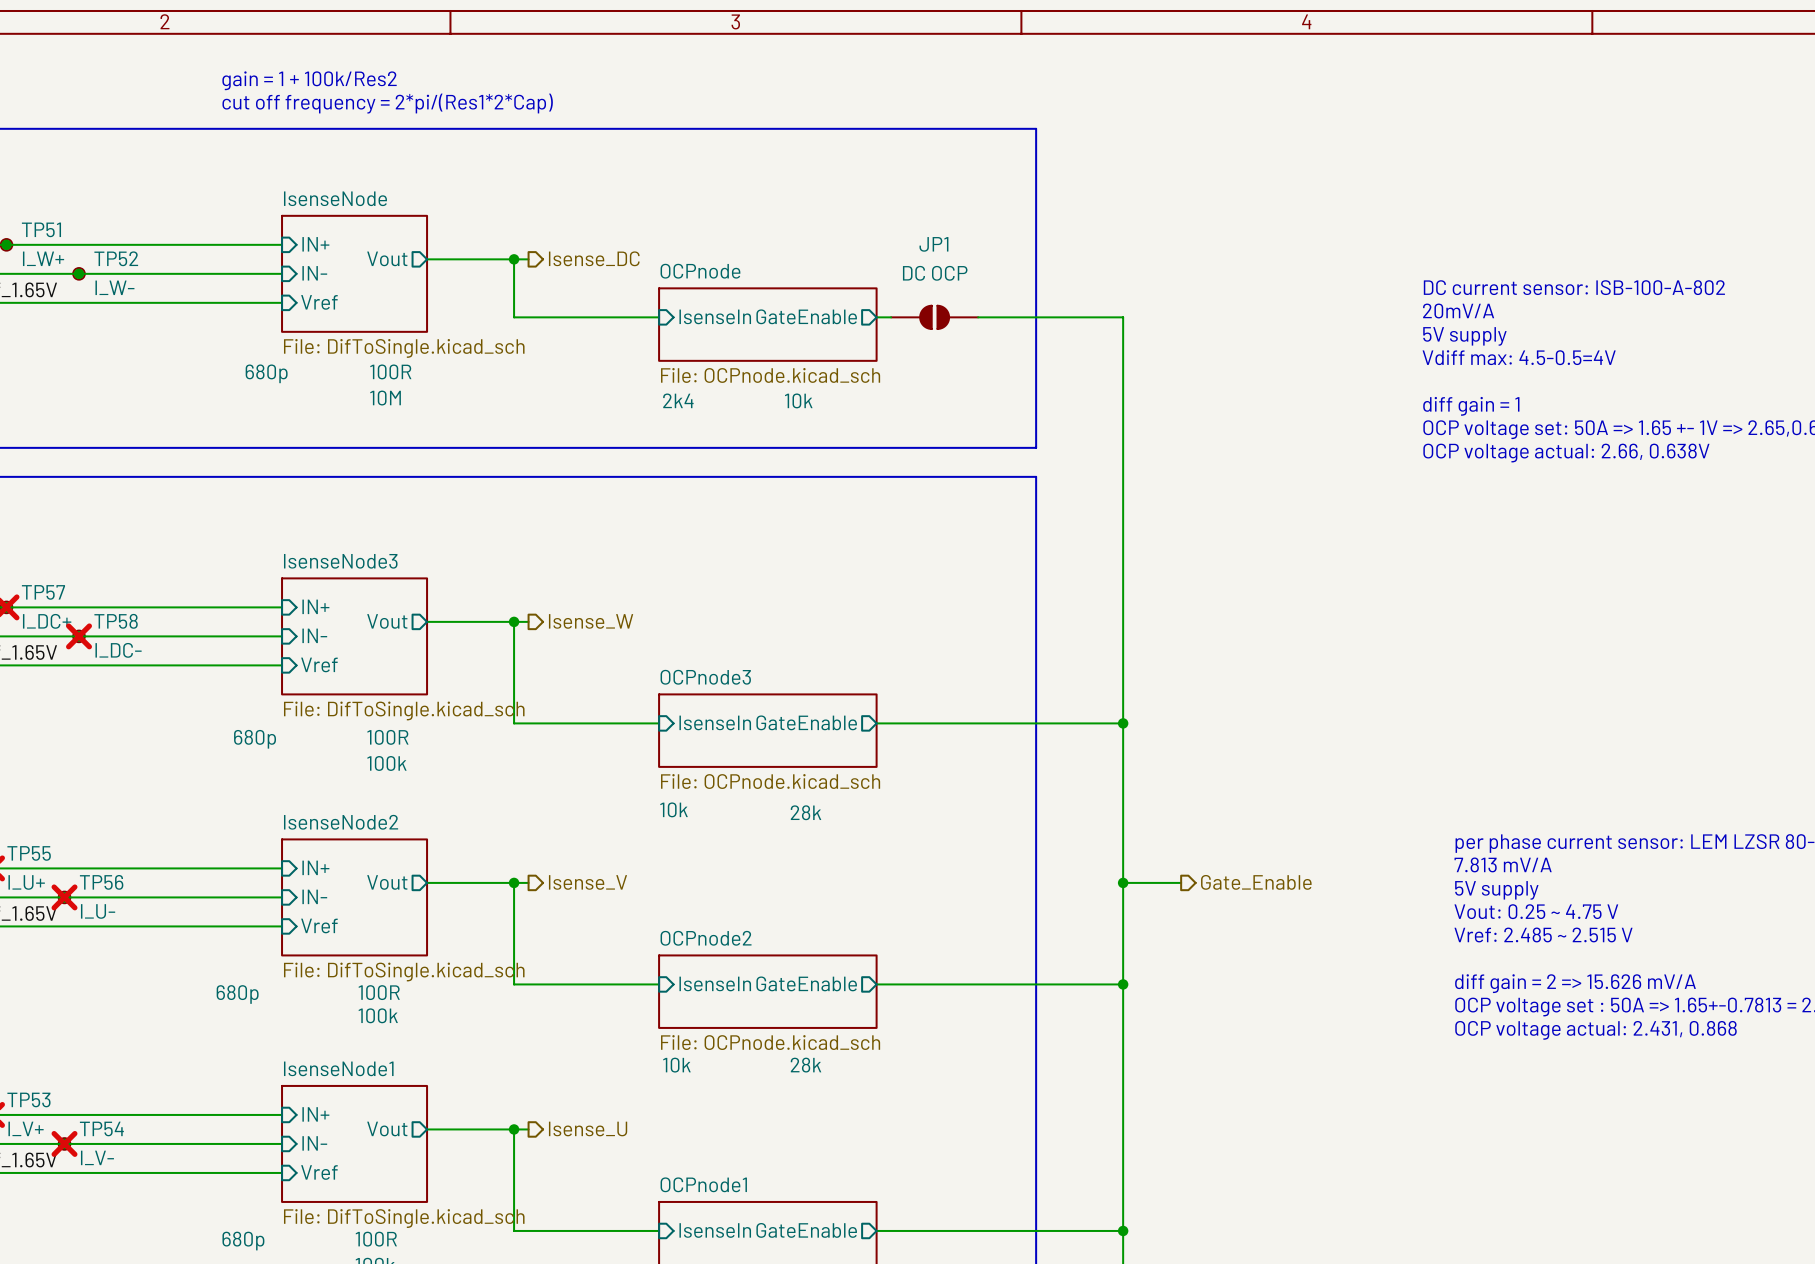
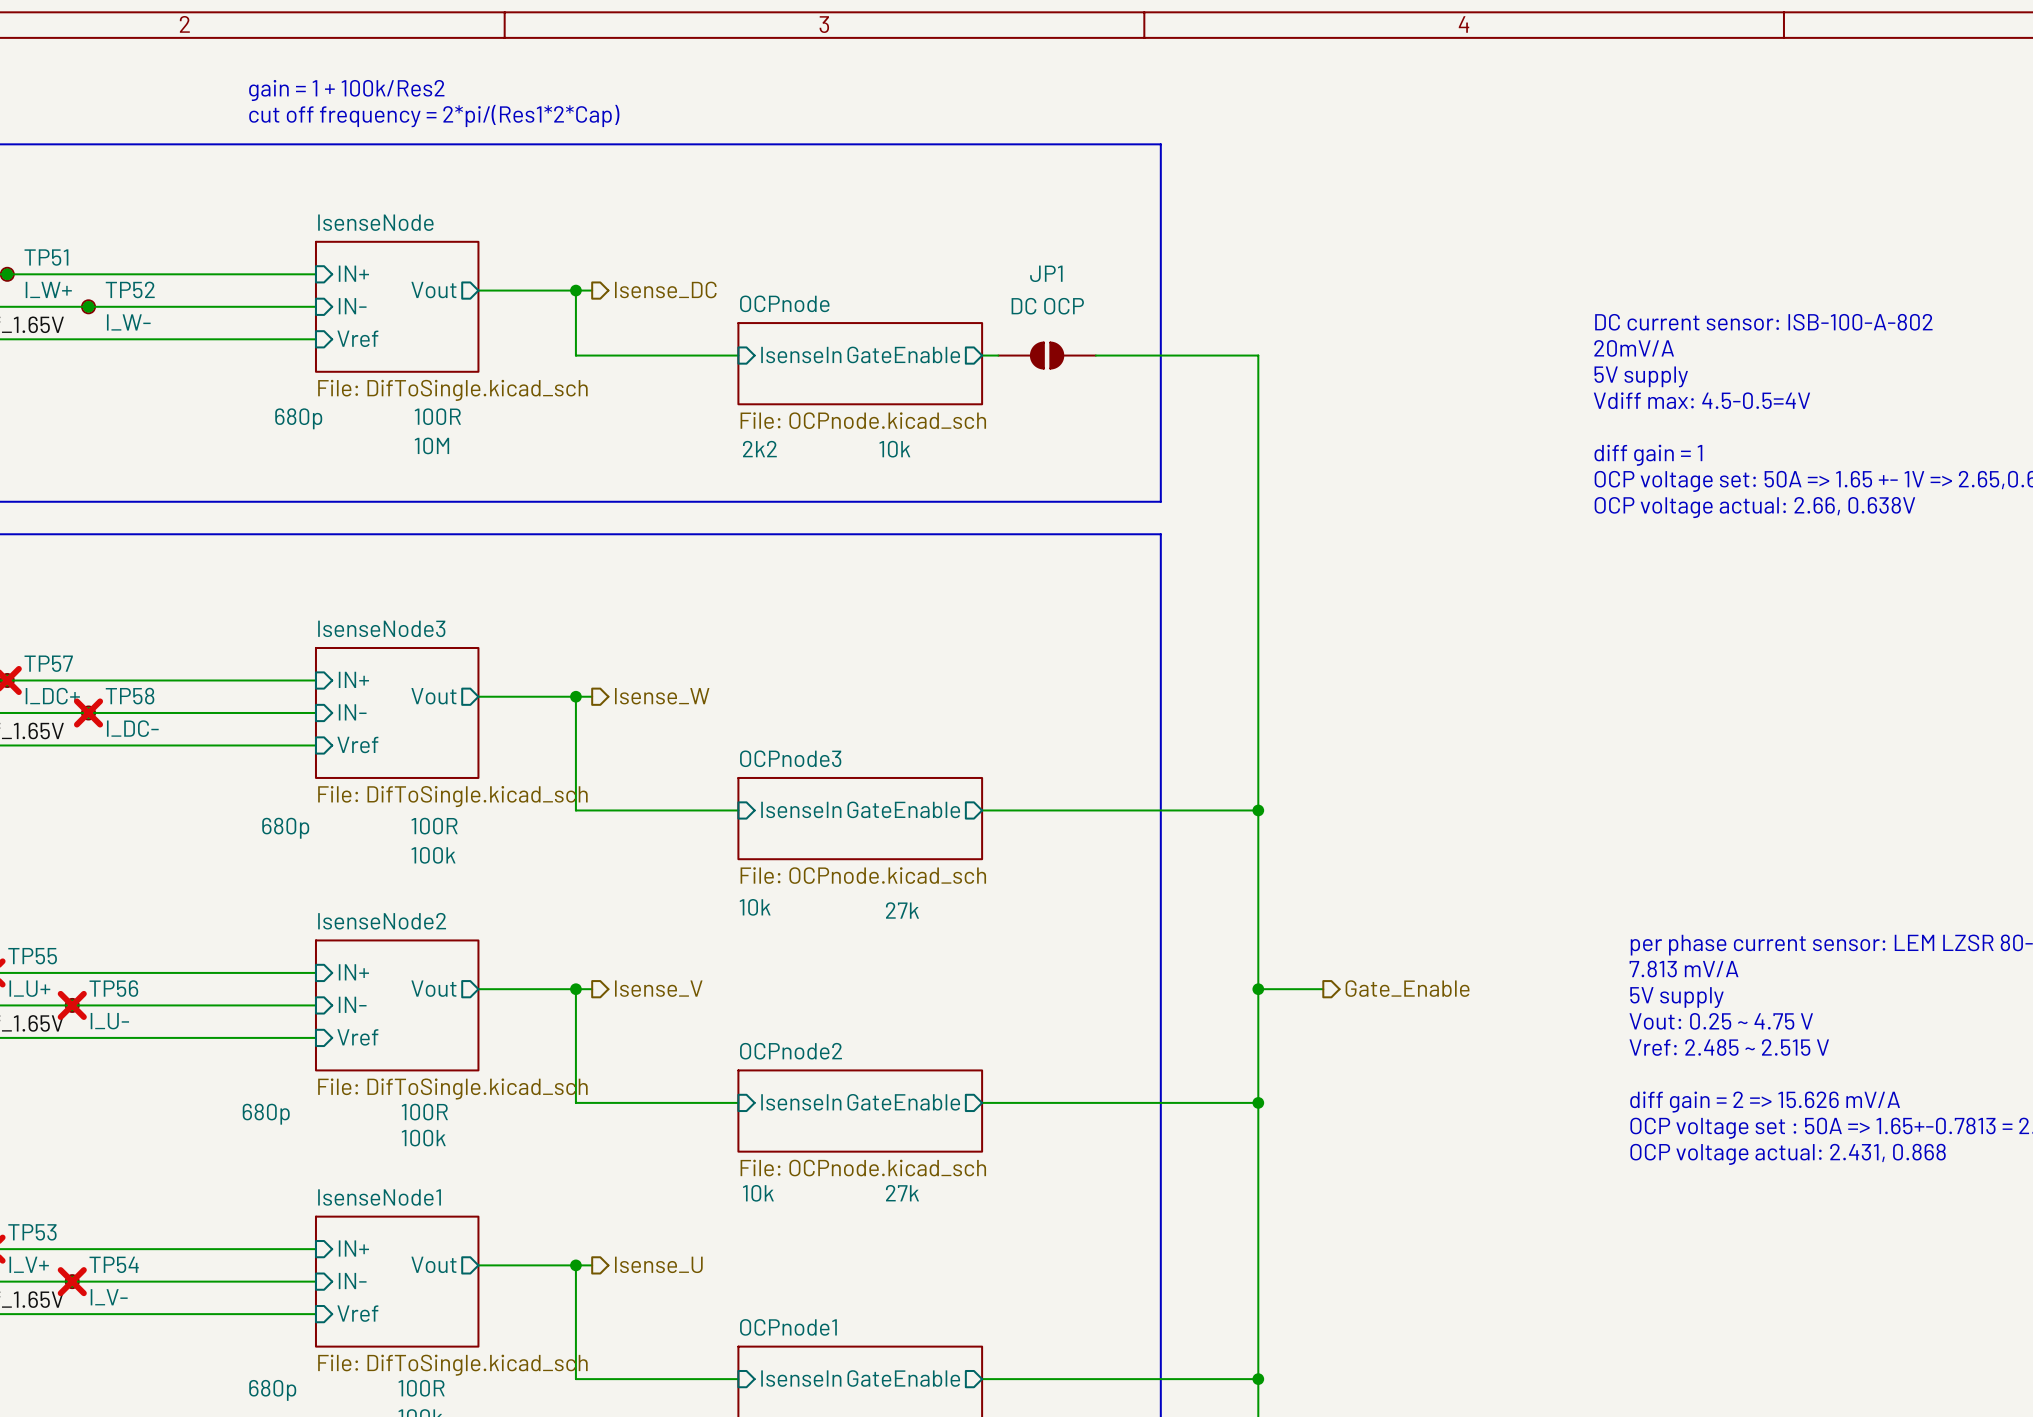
sheet OCPnode text: 2k4 (678, 400) -> 2k2 (759, 449)
sheet OCPnode3 text: 28k (806, 812) -> 27k (902, 910)
sheet OCPnode2 text: 28k (806, 1065) -> 27k (902, 1193)

